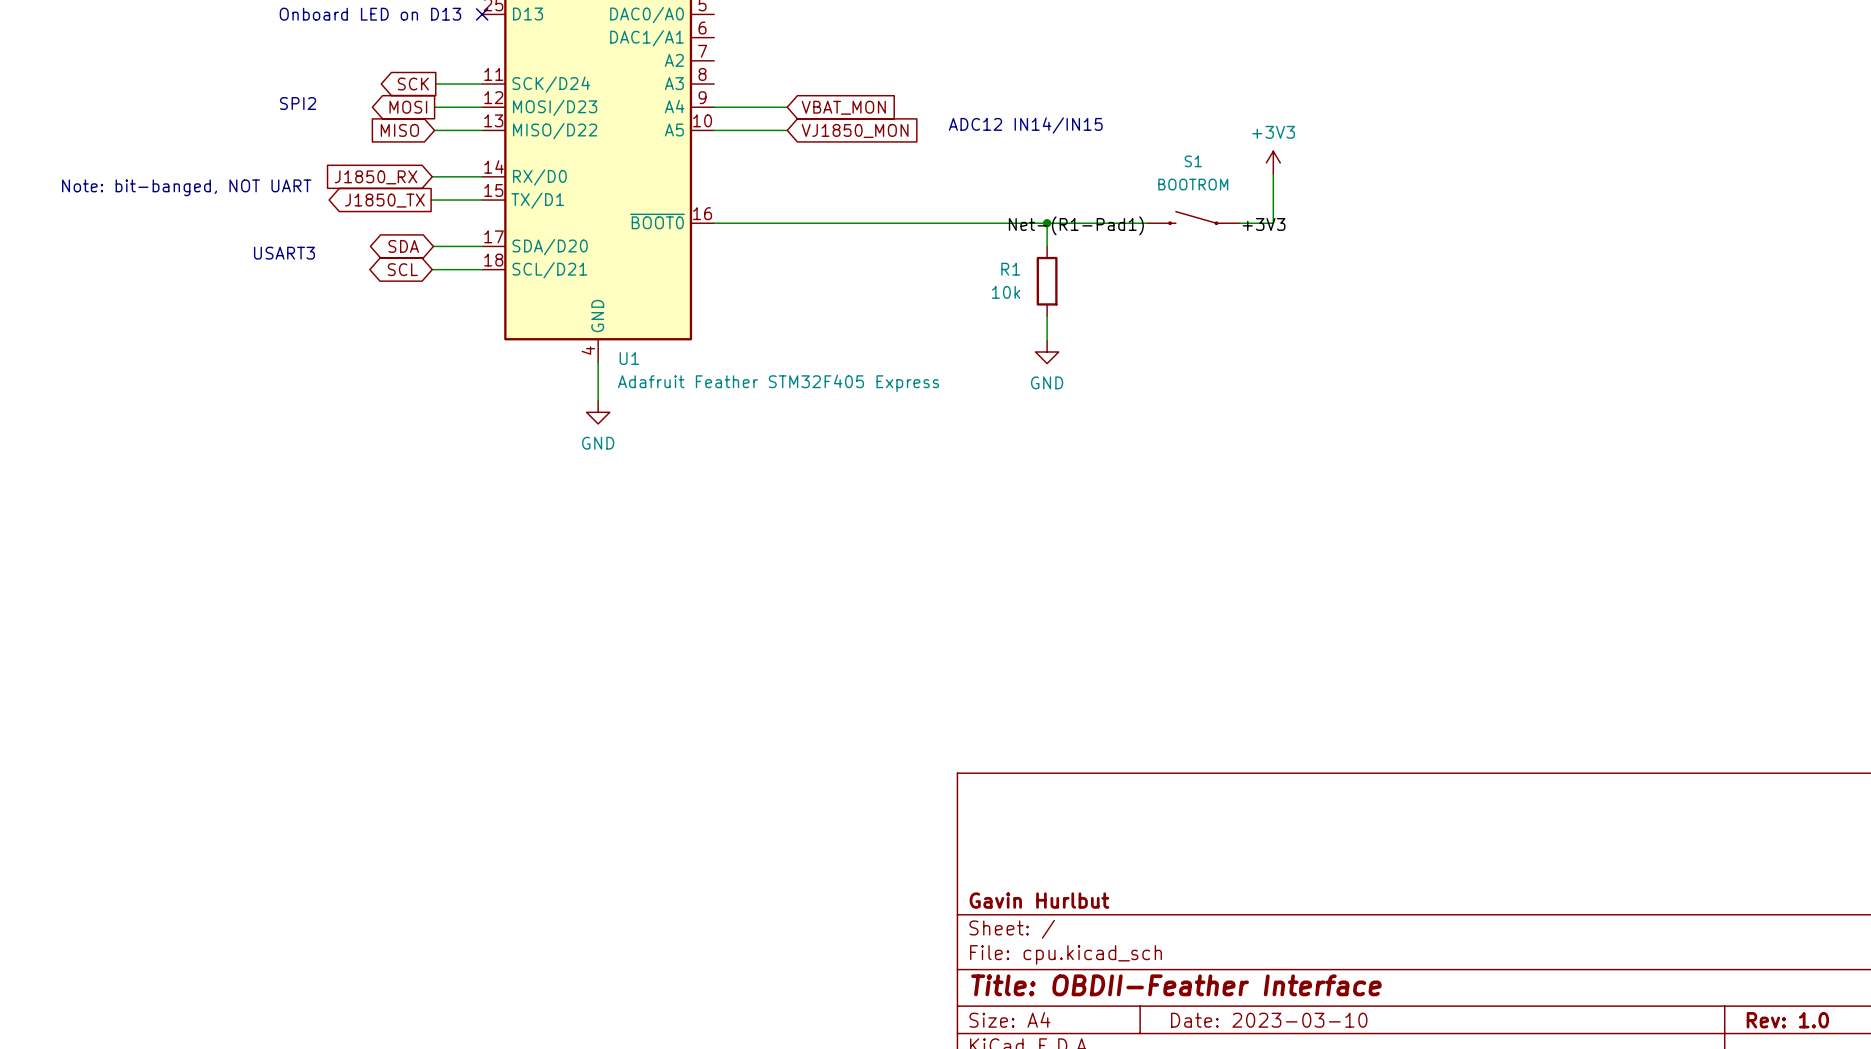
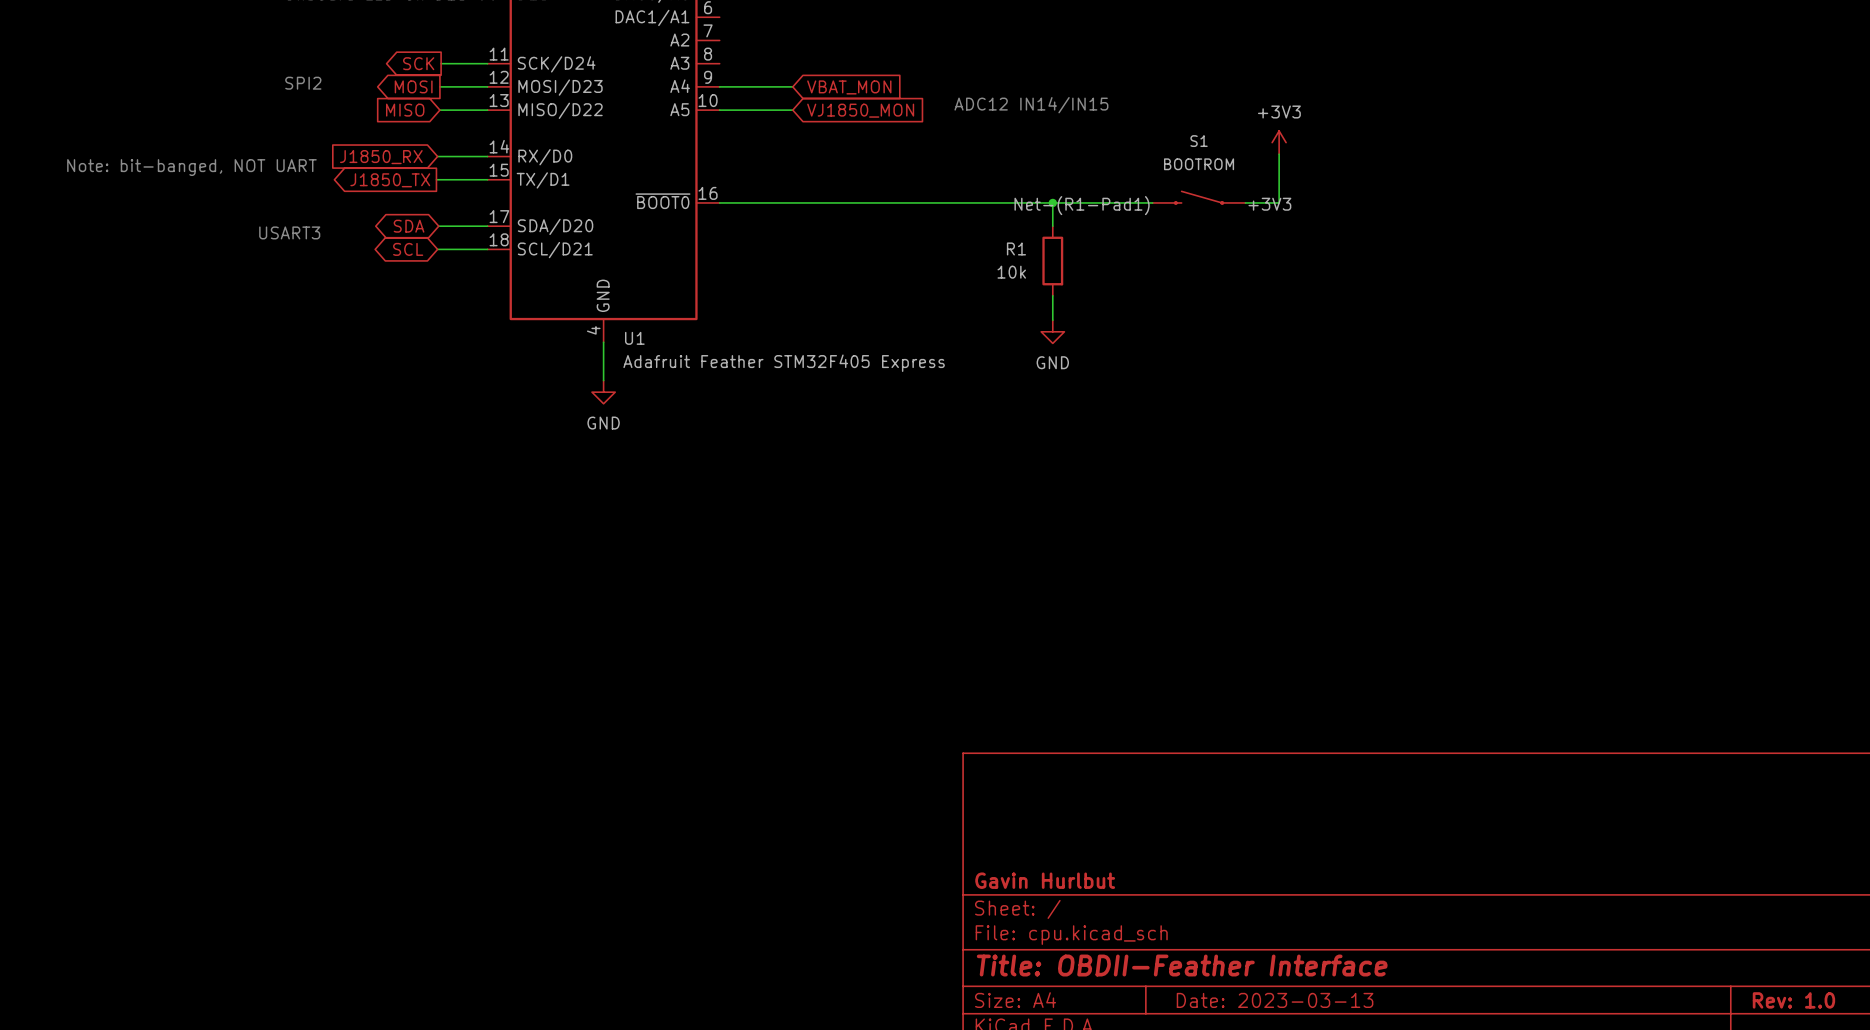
title block: Date: 2023-03-10 (1269, 1020) -> Date: 2023-03-13 (1275, 1000)

